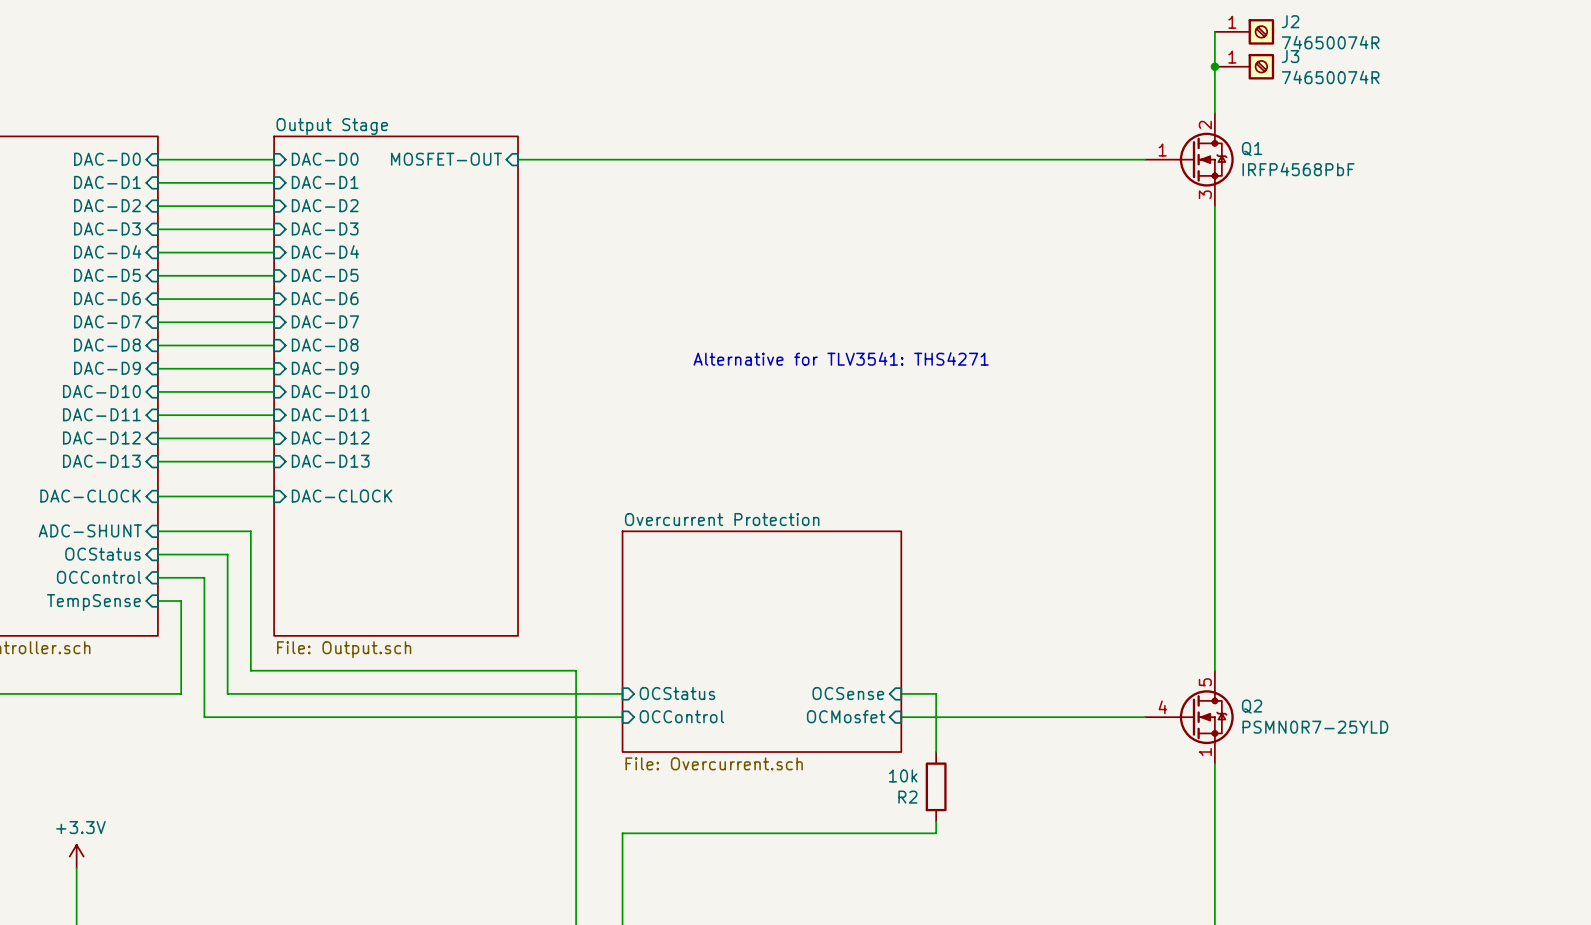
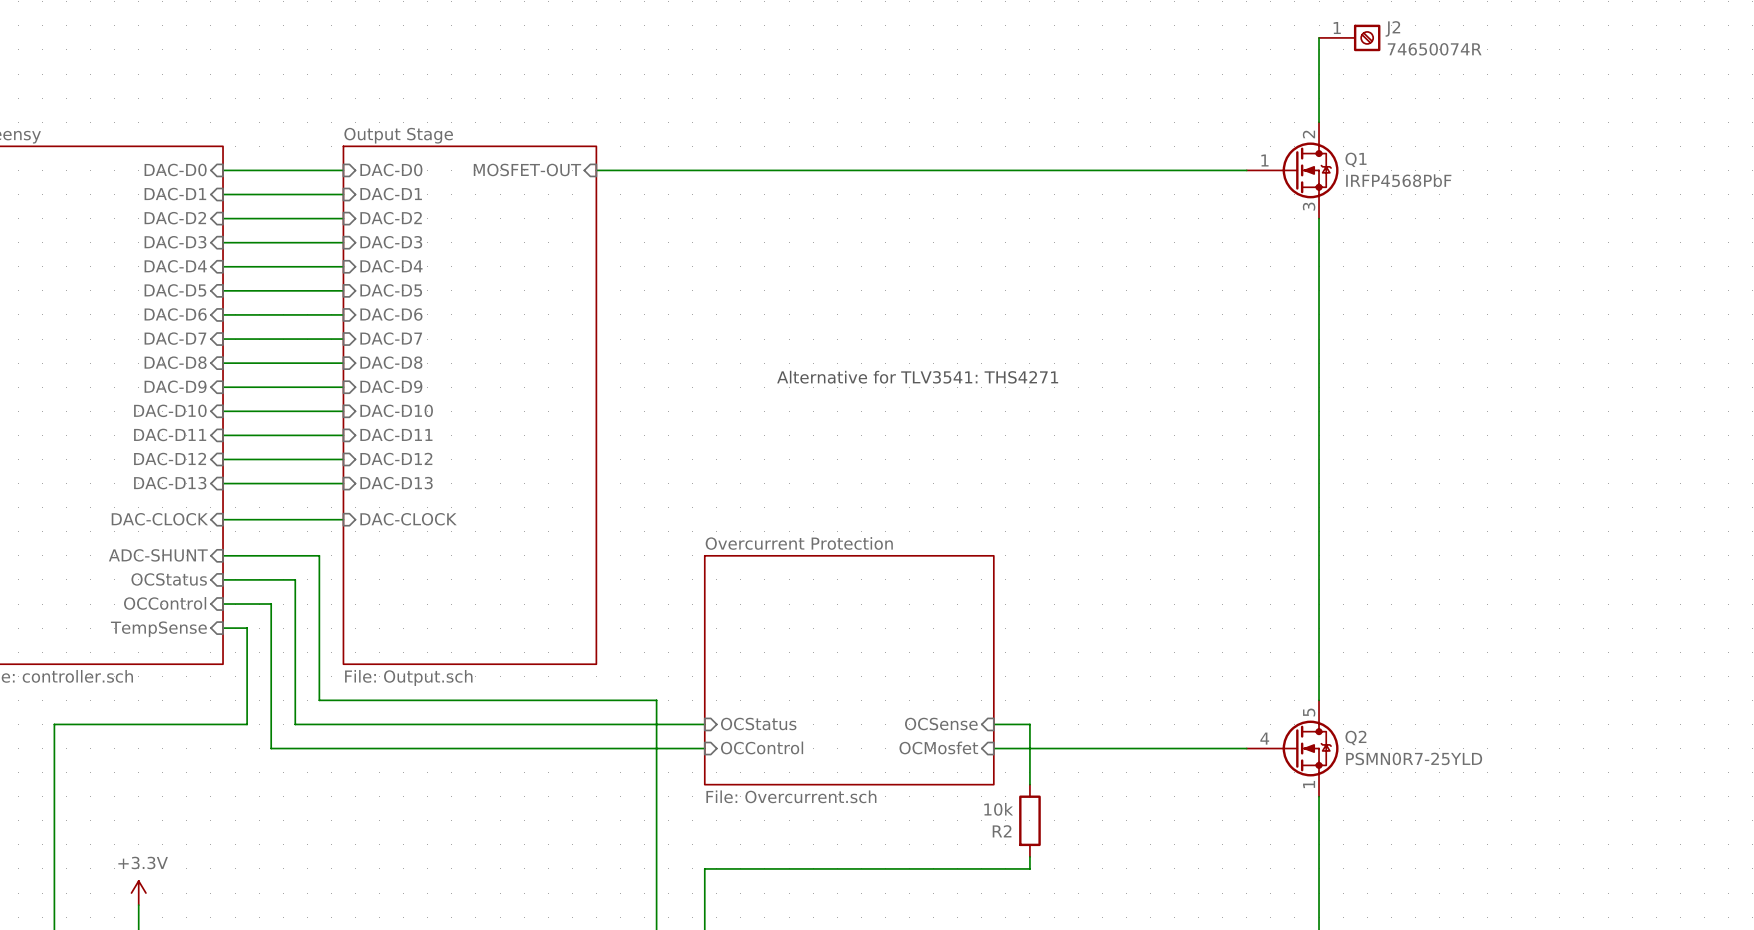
junction: (1214, 66) -> none
J3: 74650074R (1244, 66) -> none

